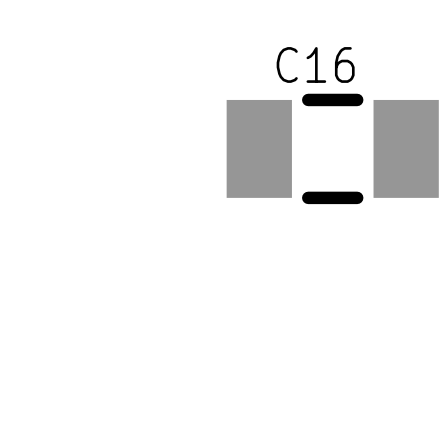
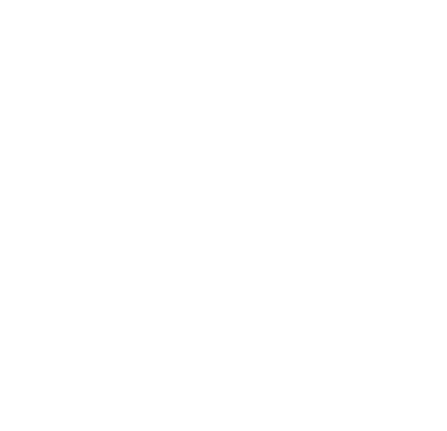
C16: (332, 148) -> none

